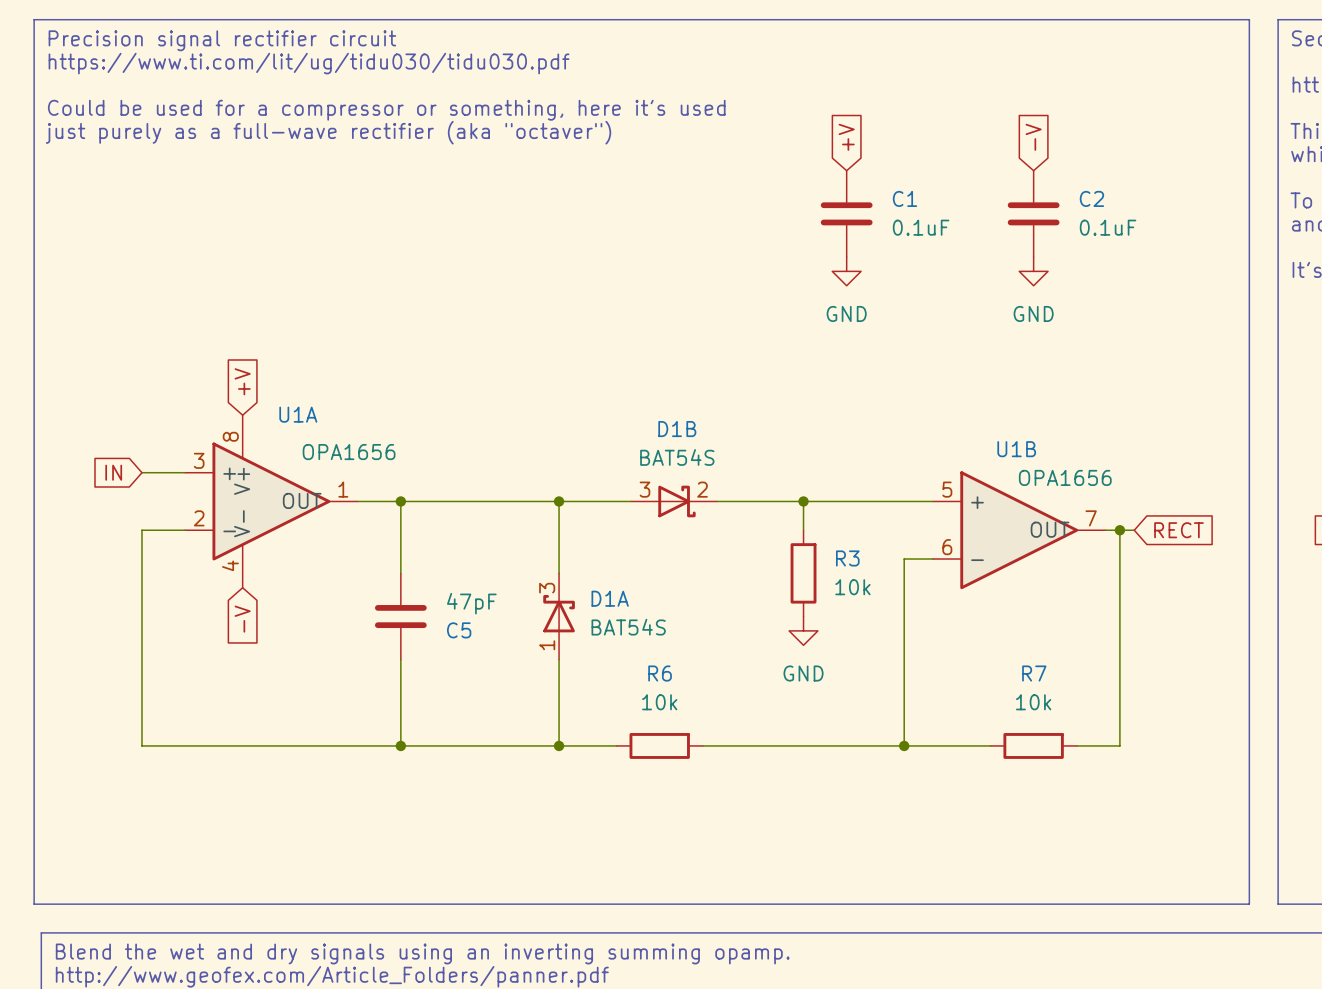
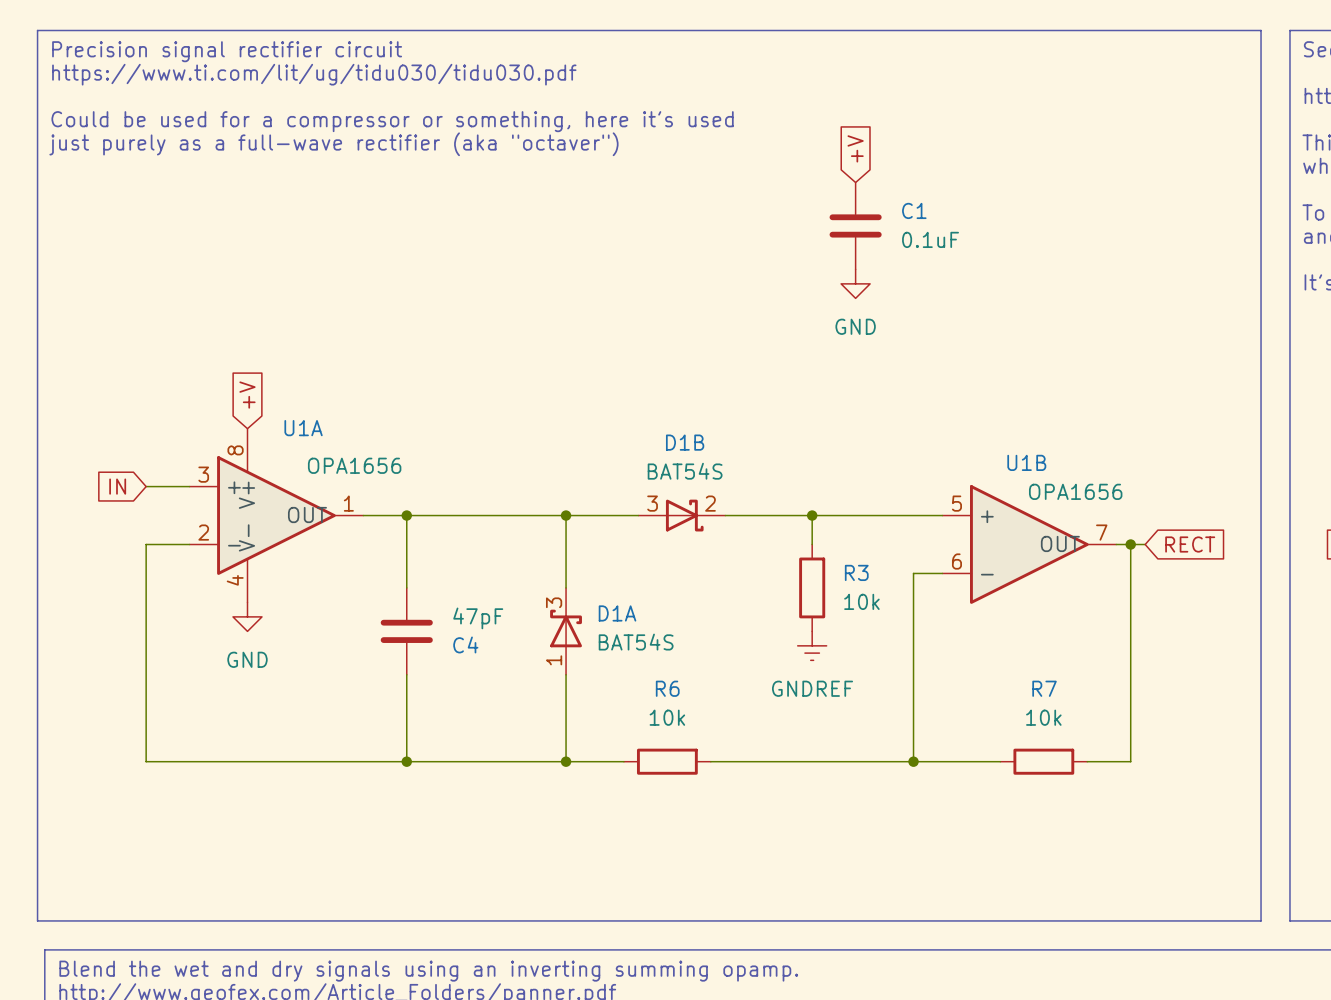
global label: -V (1033, 137) -> none
C2: 0.1uF (1033, 213) -> none
power symbol: GND (1033, 271) -> none
power symbol: none -> GND (247, 616)
global label: -V (242, 619) -> none
C5 name: C5 (459, 630) -> C4 (465, 644)
power symbol: GND (803, 630) -> GNDREF (812, 645)

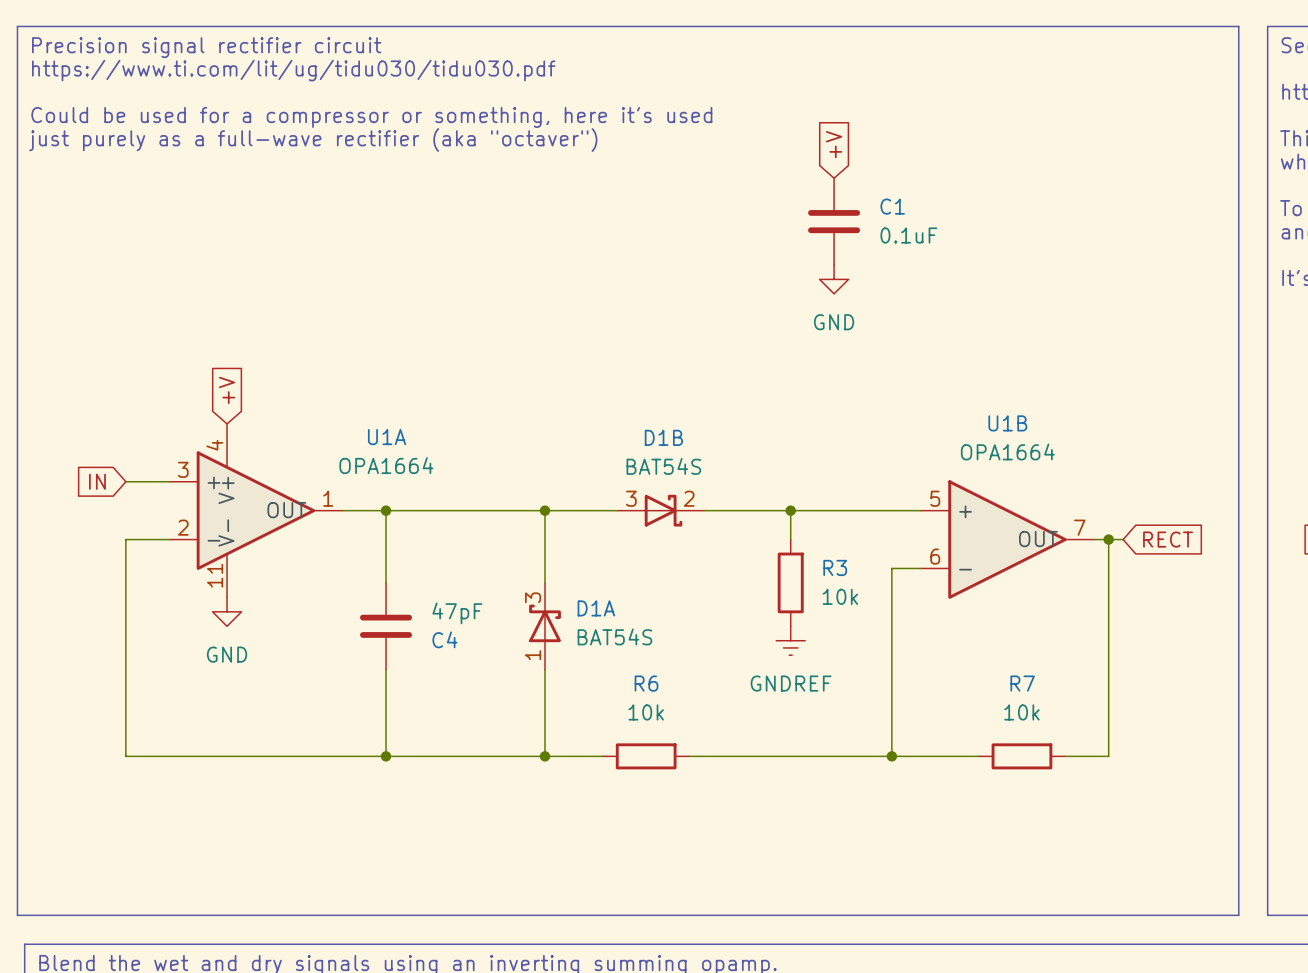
U1A name position: U1A (303, 428) -> U1A (387, 437)
U1A pin number: 8 (235, 450) -> 4 (214, 445)
U1B name position: U1B (1026, 462) -> U1B (1007, 423)
U1A value: OPA1656 (354, 465) -> OPA1664 (386, 465)
U1B value: OPA1656 (1075, 491) -> OPA1664 (1007, 451)
U1A pin number: 4 (235, 580) -> 11 (215, 575)

